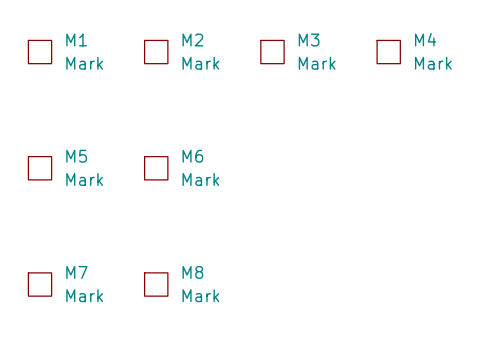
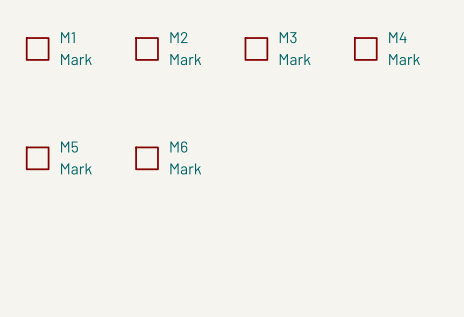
M7: Mark (40, 284) -> none
M8: Mark (156, 284) -> none

